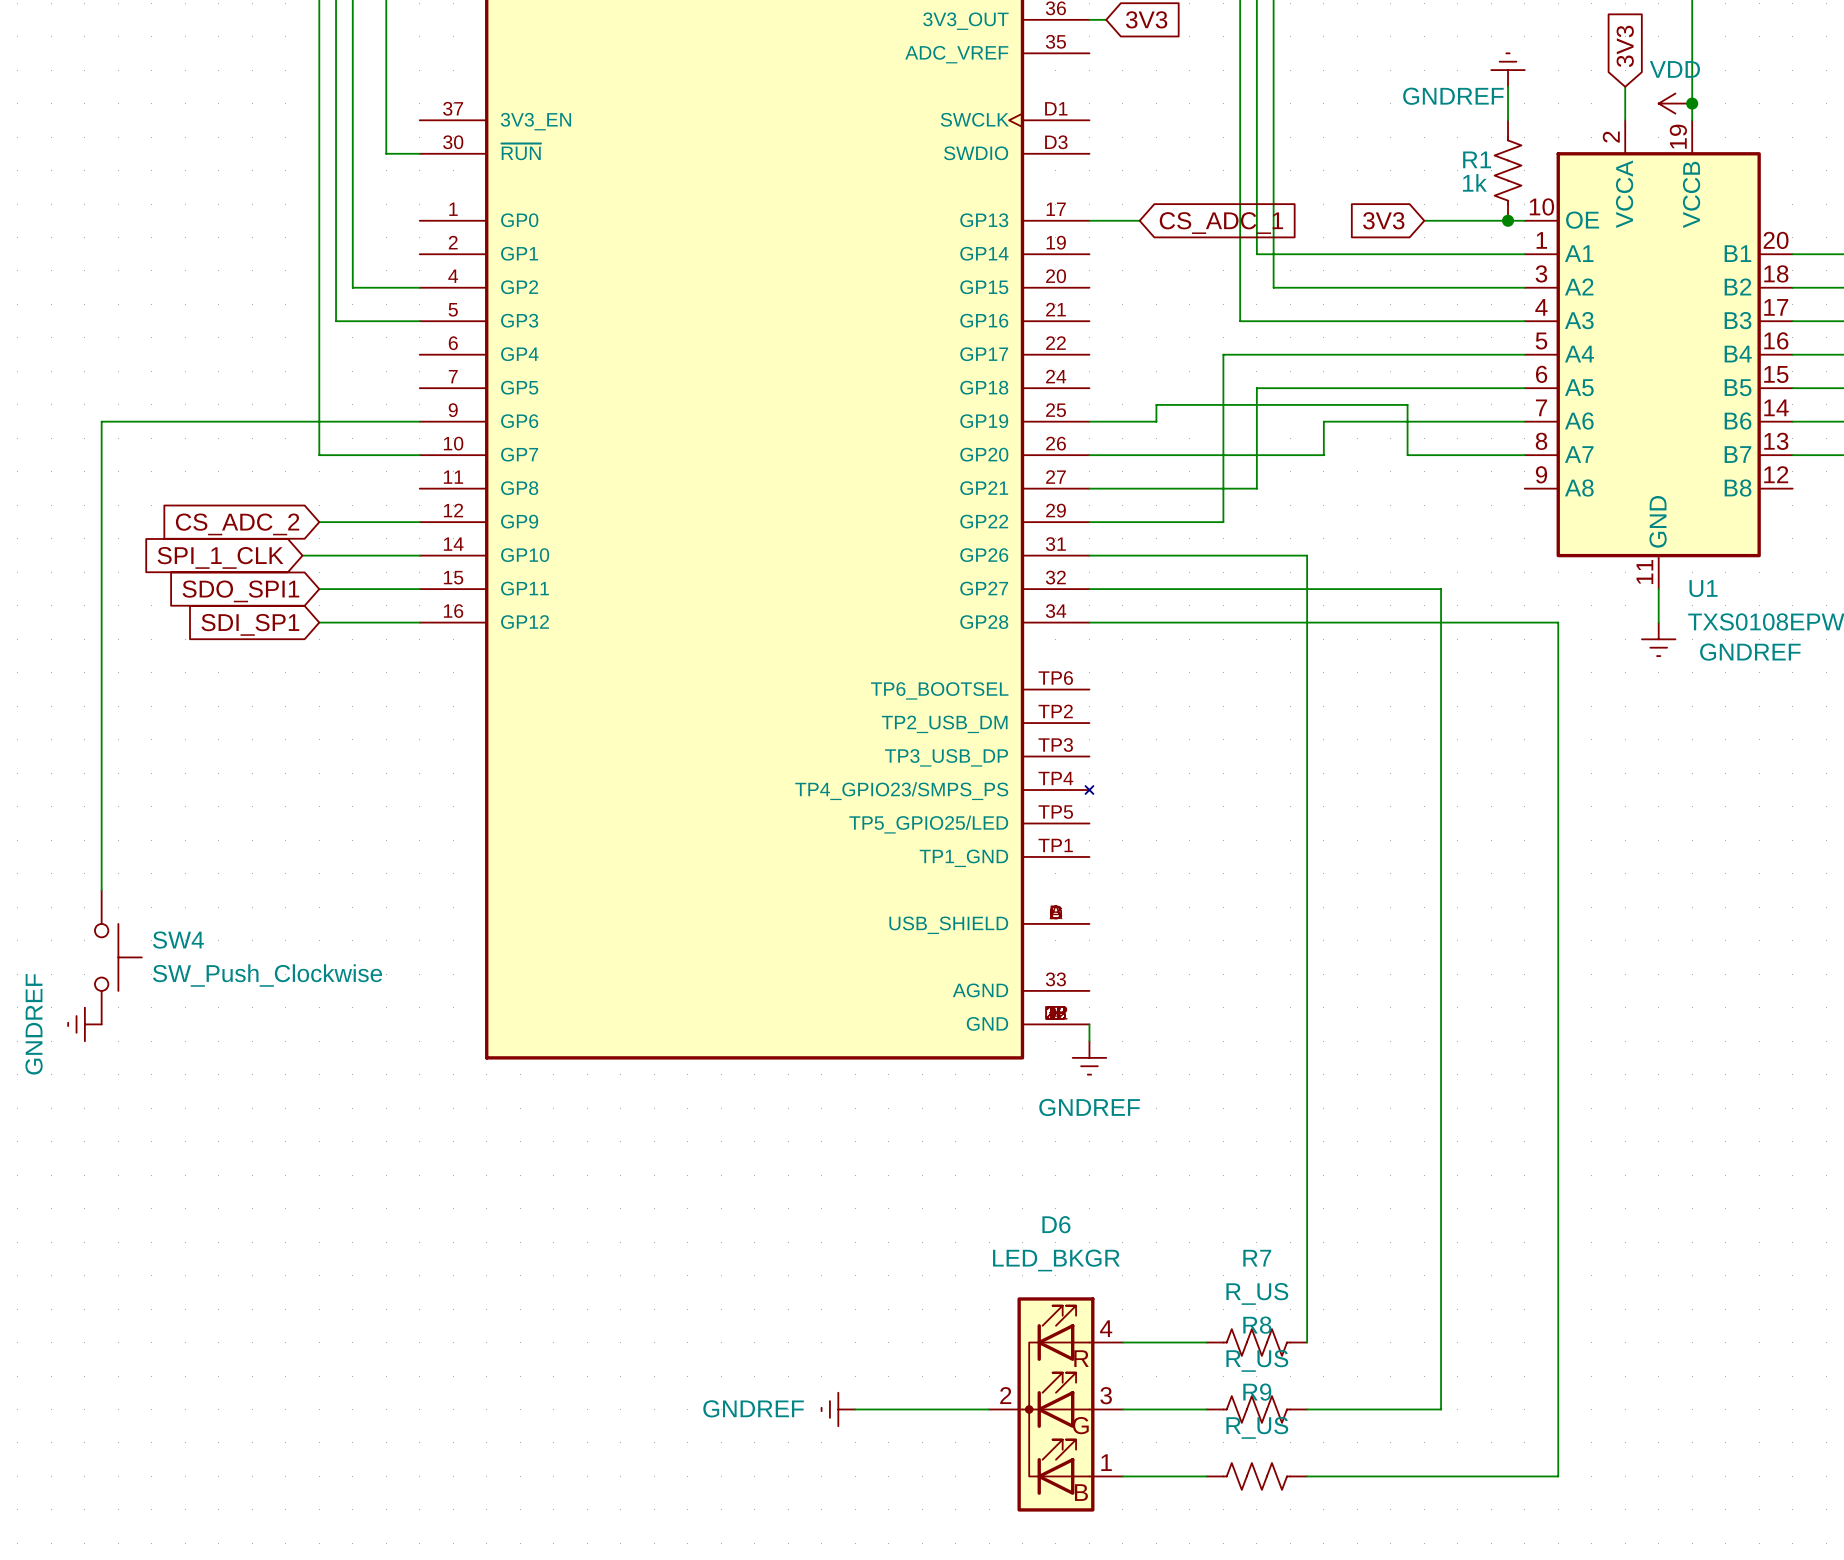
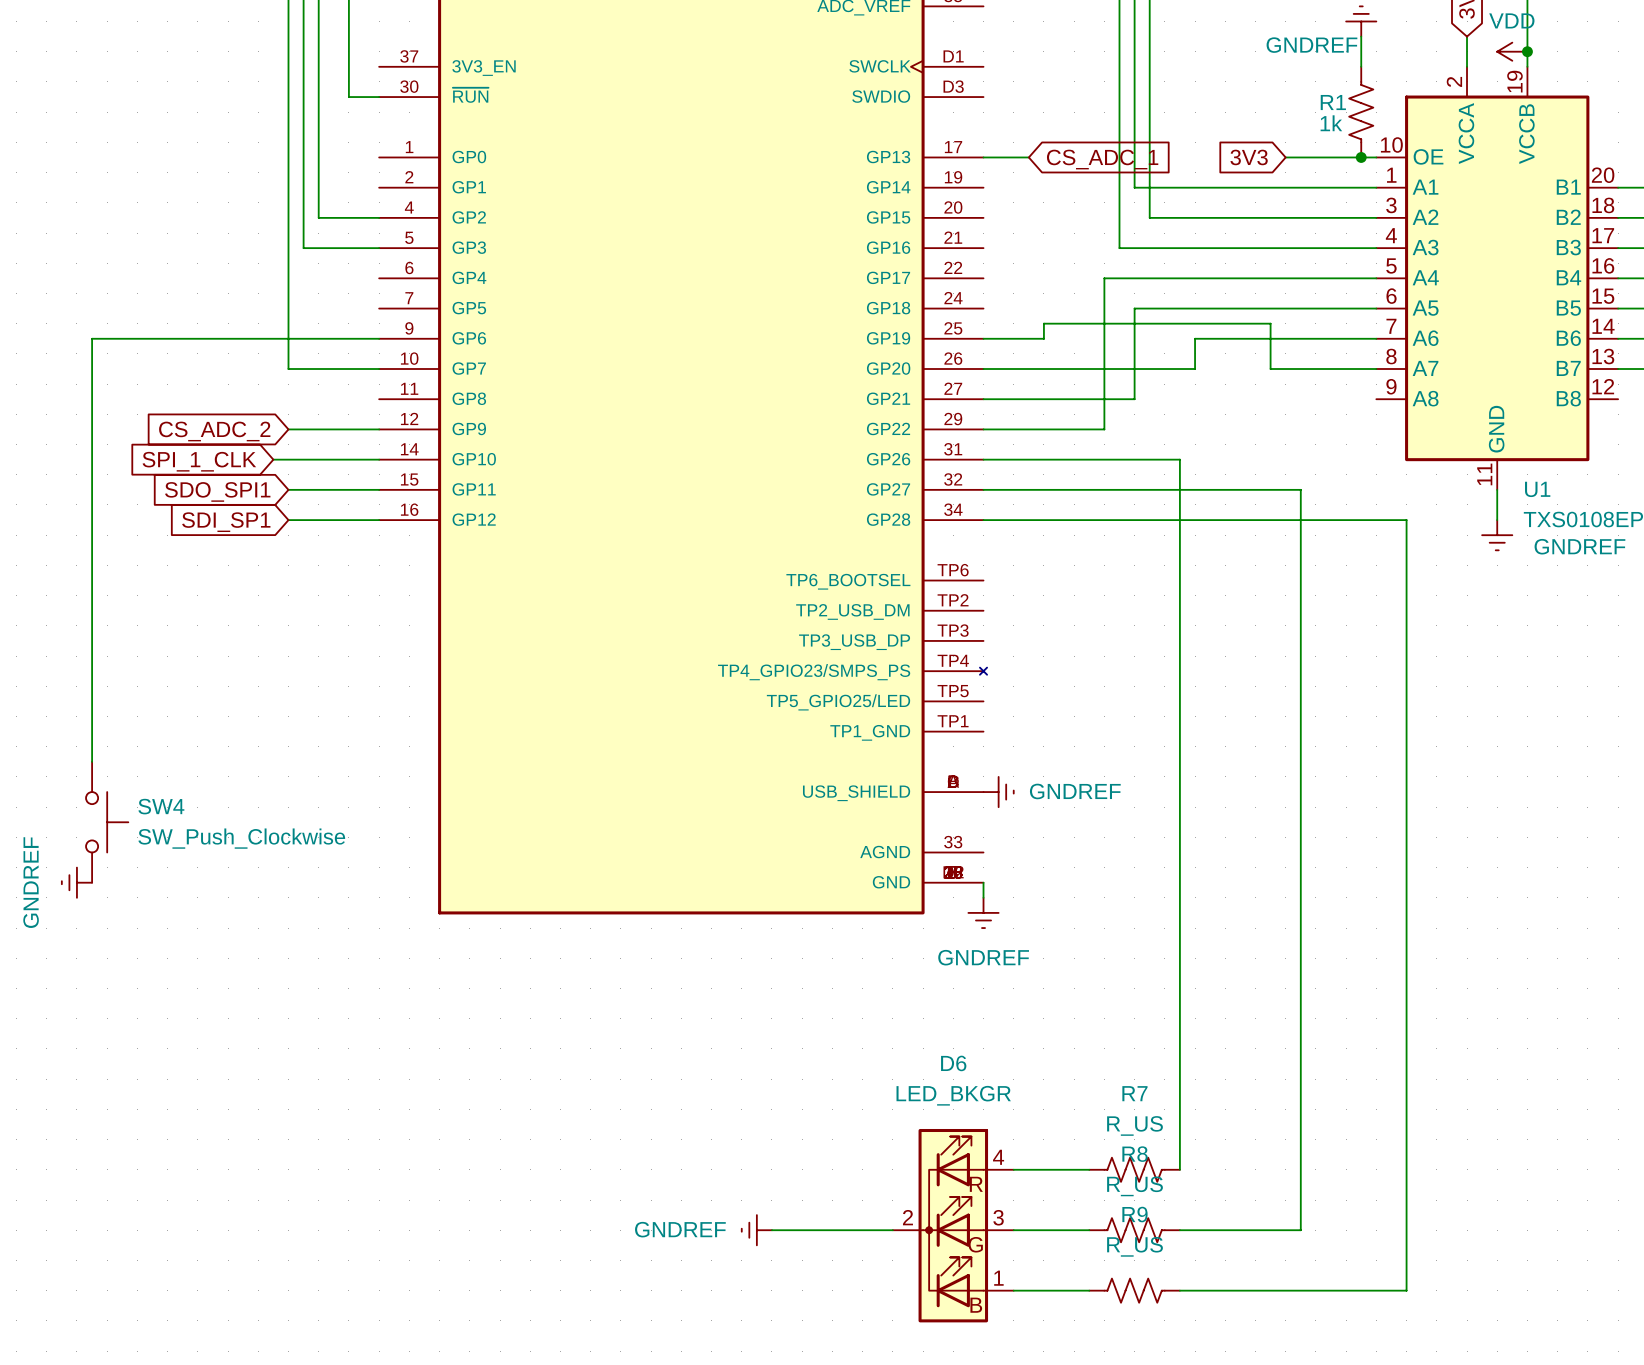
power symbol: none -> GNDREF (998, 792)

